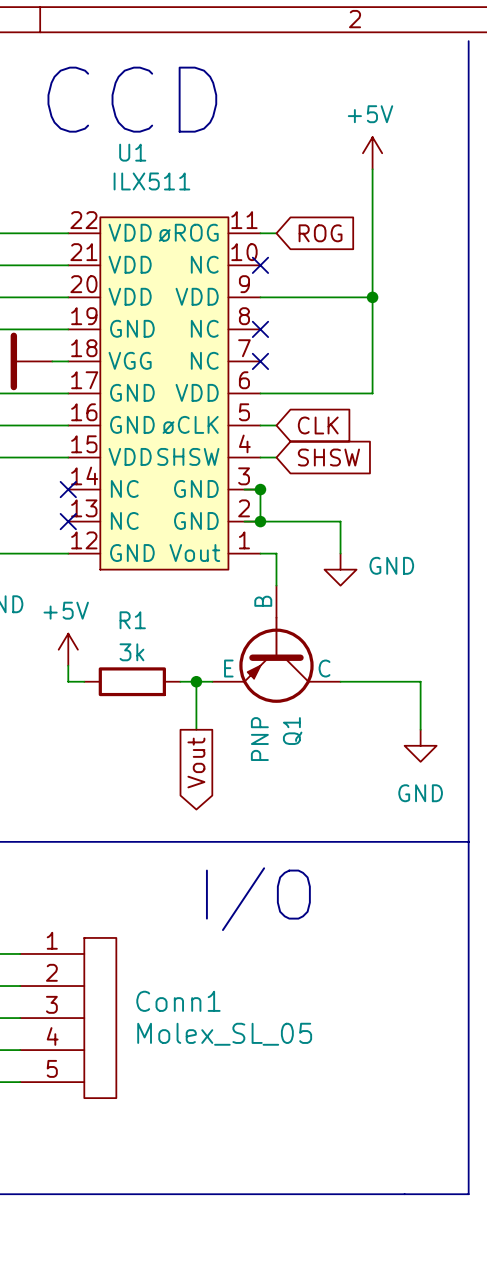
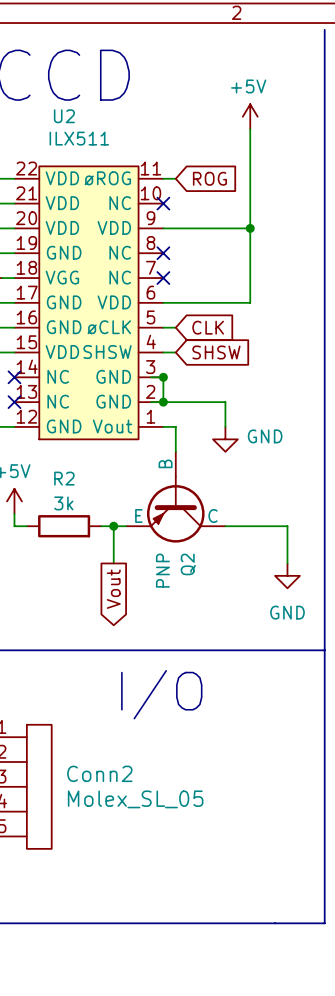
U1 name: U1 (132, 152) -> U2 (64, 116)
R1 name: R1 (132, 620) -> R2 (64, 478)
Q1 name: Q1 (292, 731) -> Q2 (188, 564)
Conn1 name: Conn1 (178, 1001) -> Conn2 (99, 773)

